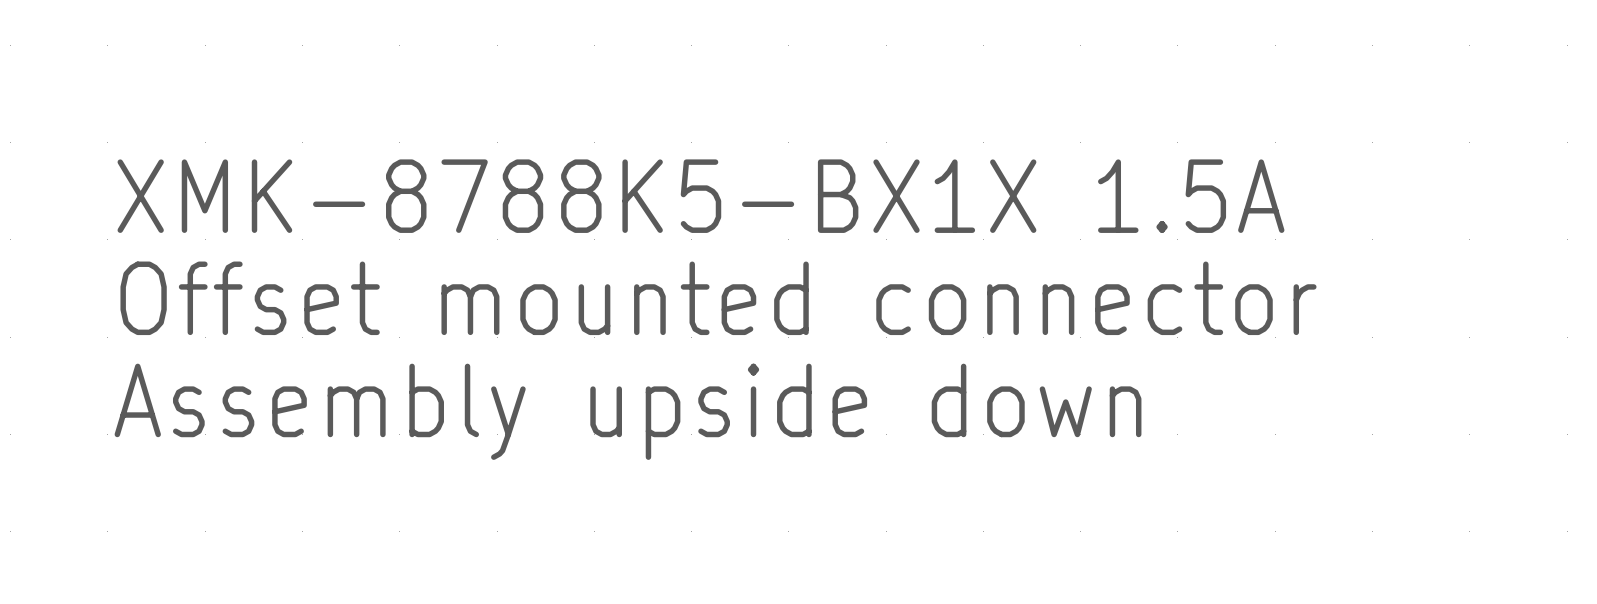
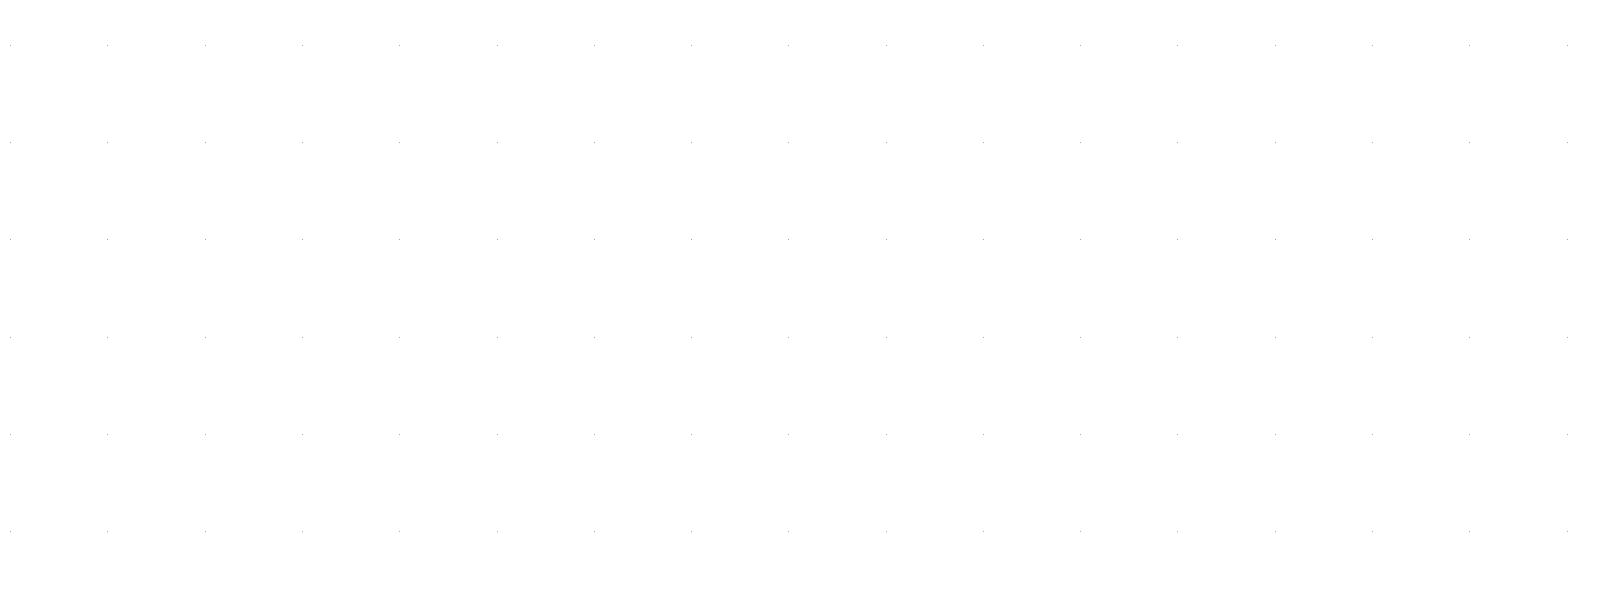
text: XMK-8788K5-BX1X 1.5A (700, 196) -> none
text: Offset mounted connector (718, 298) -> none
text: Assembly upside down (628, 411) -> none

